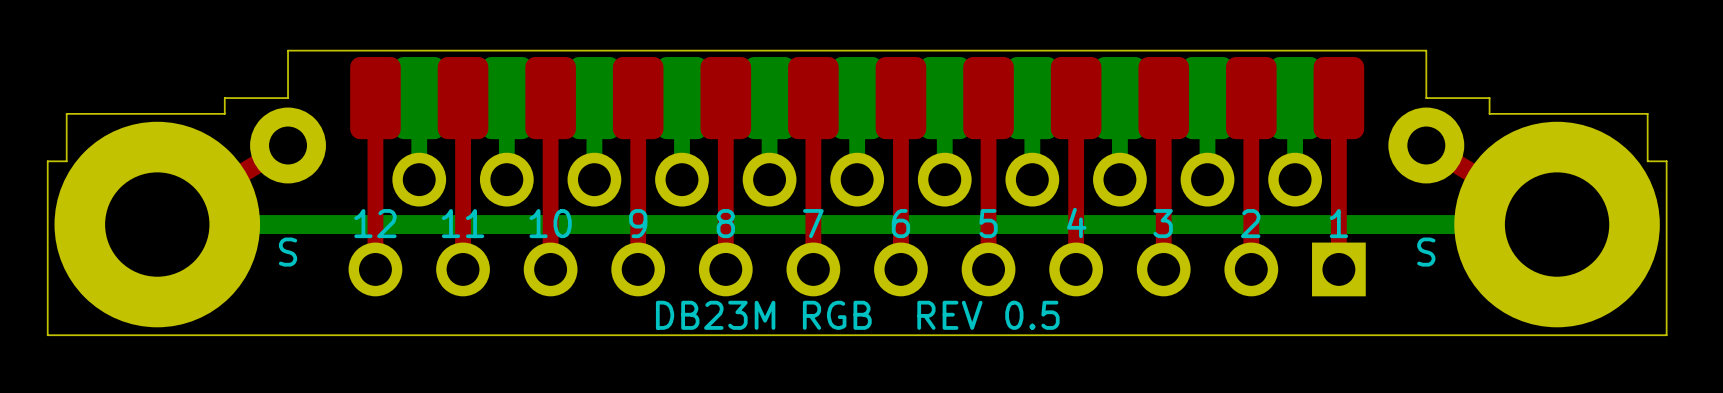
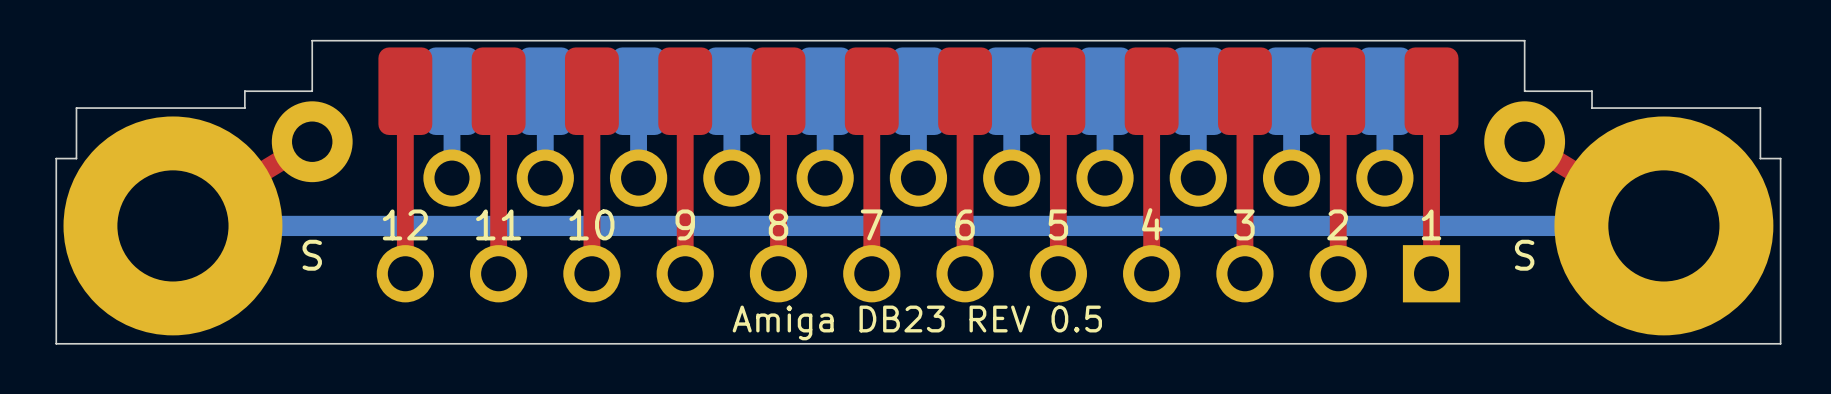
text: DB23M RGB REV 0.5 (857, 315) -> Amiga DB23 REV 0.5 (917, 322)

